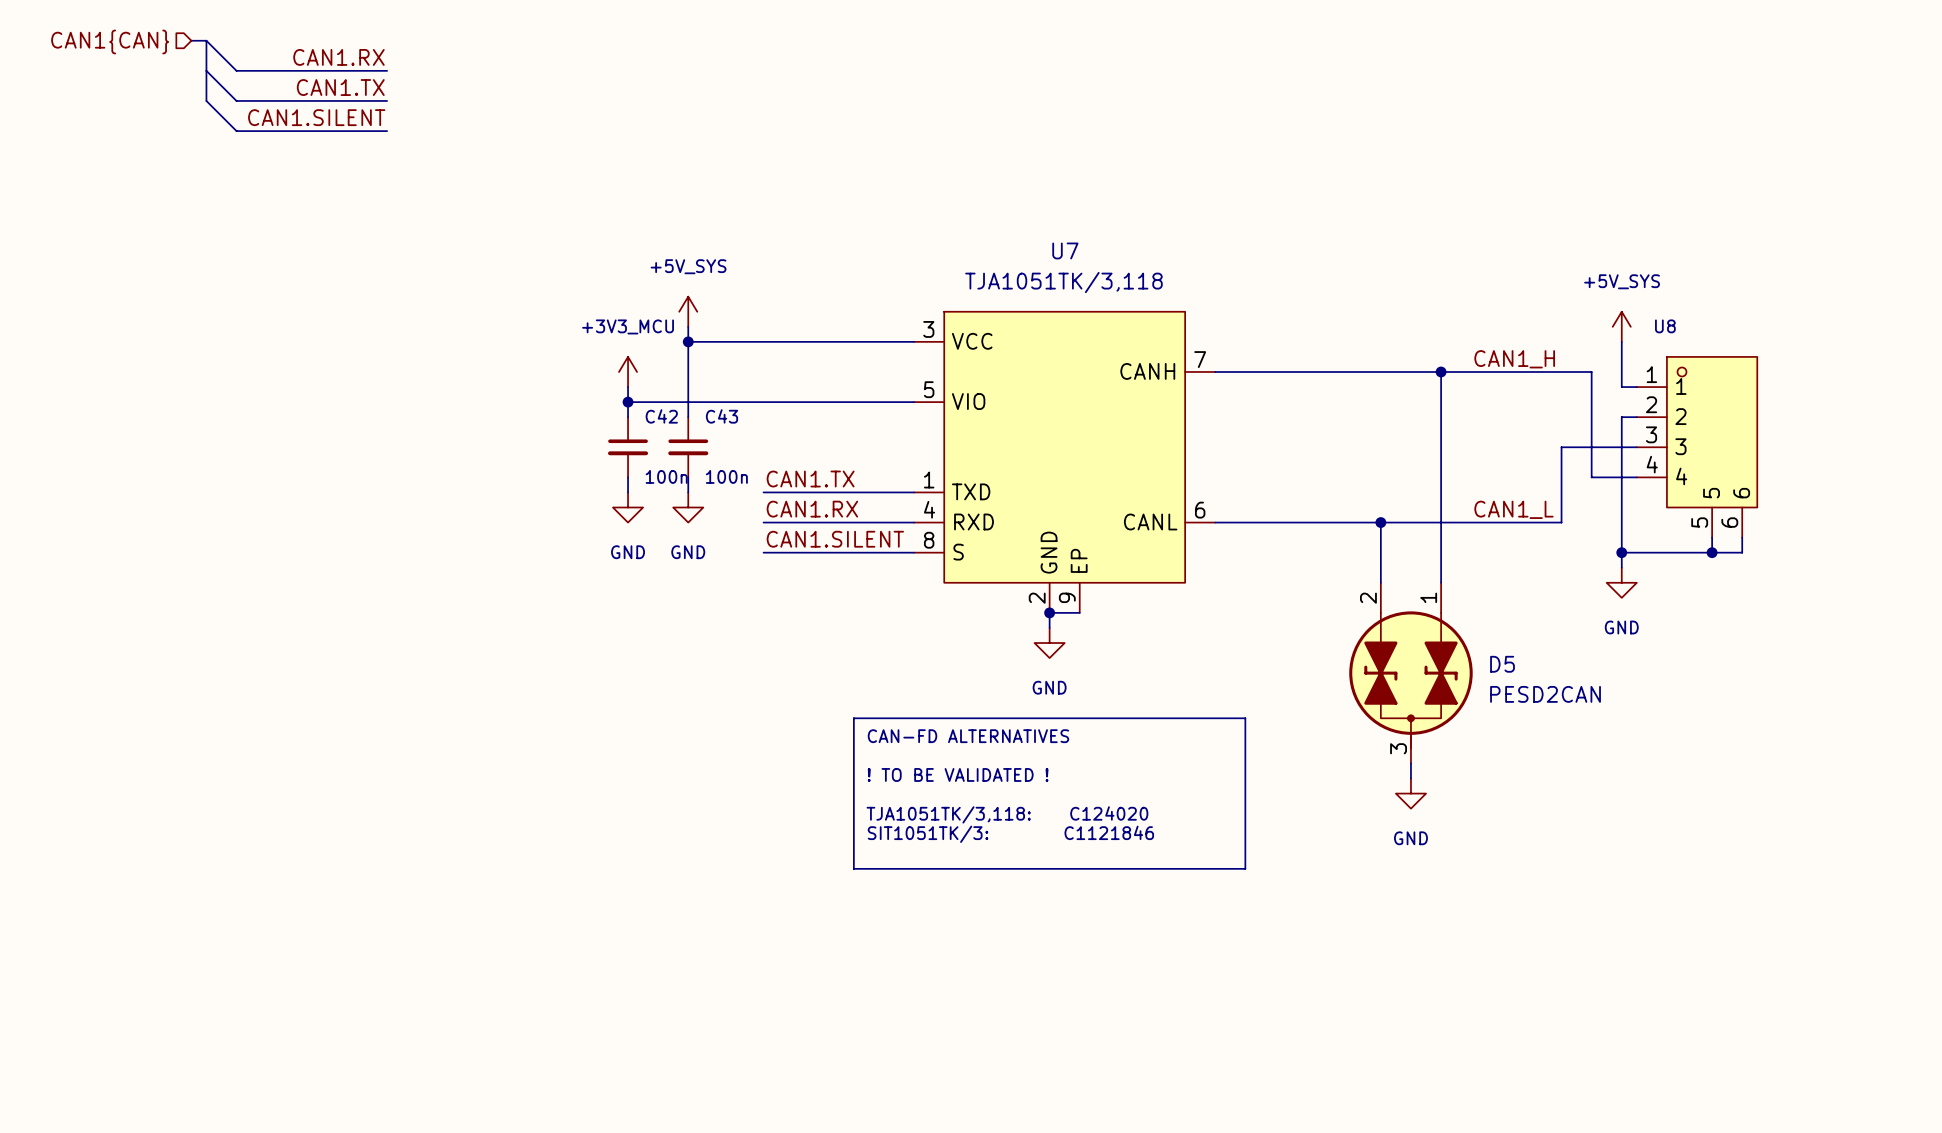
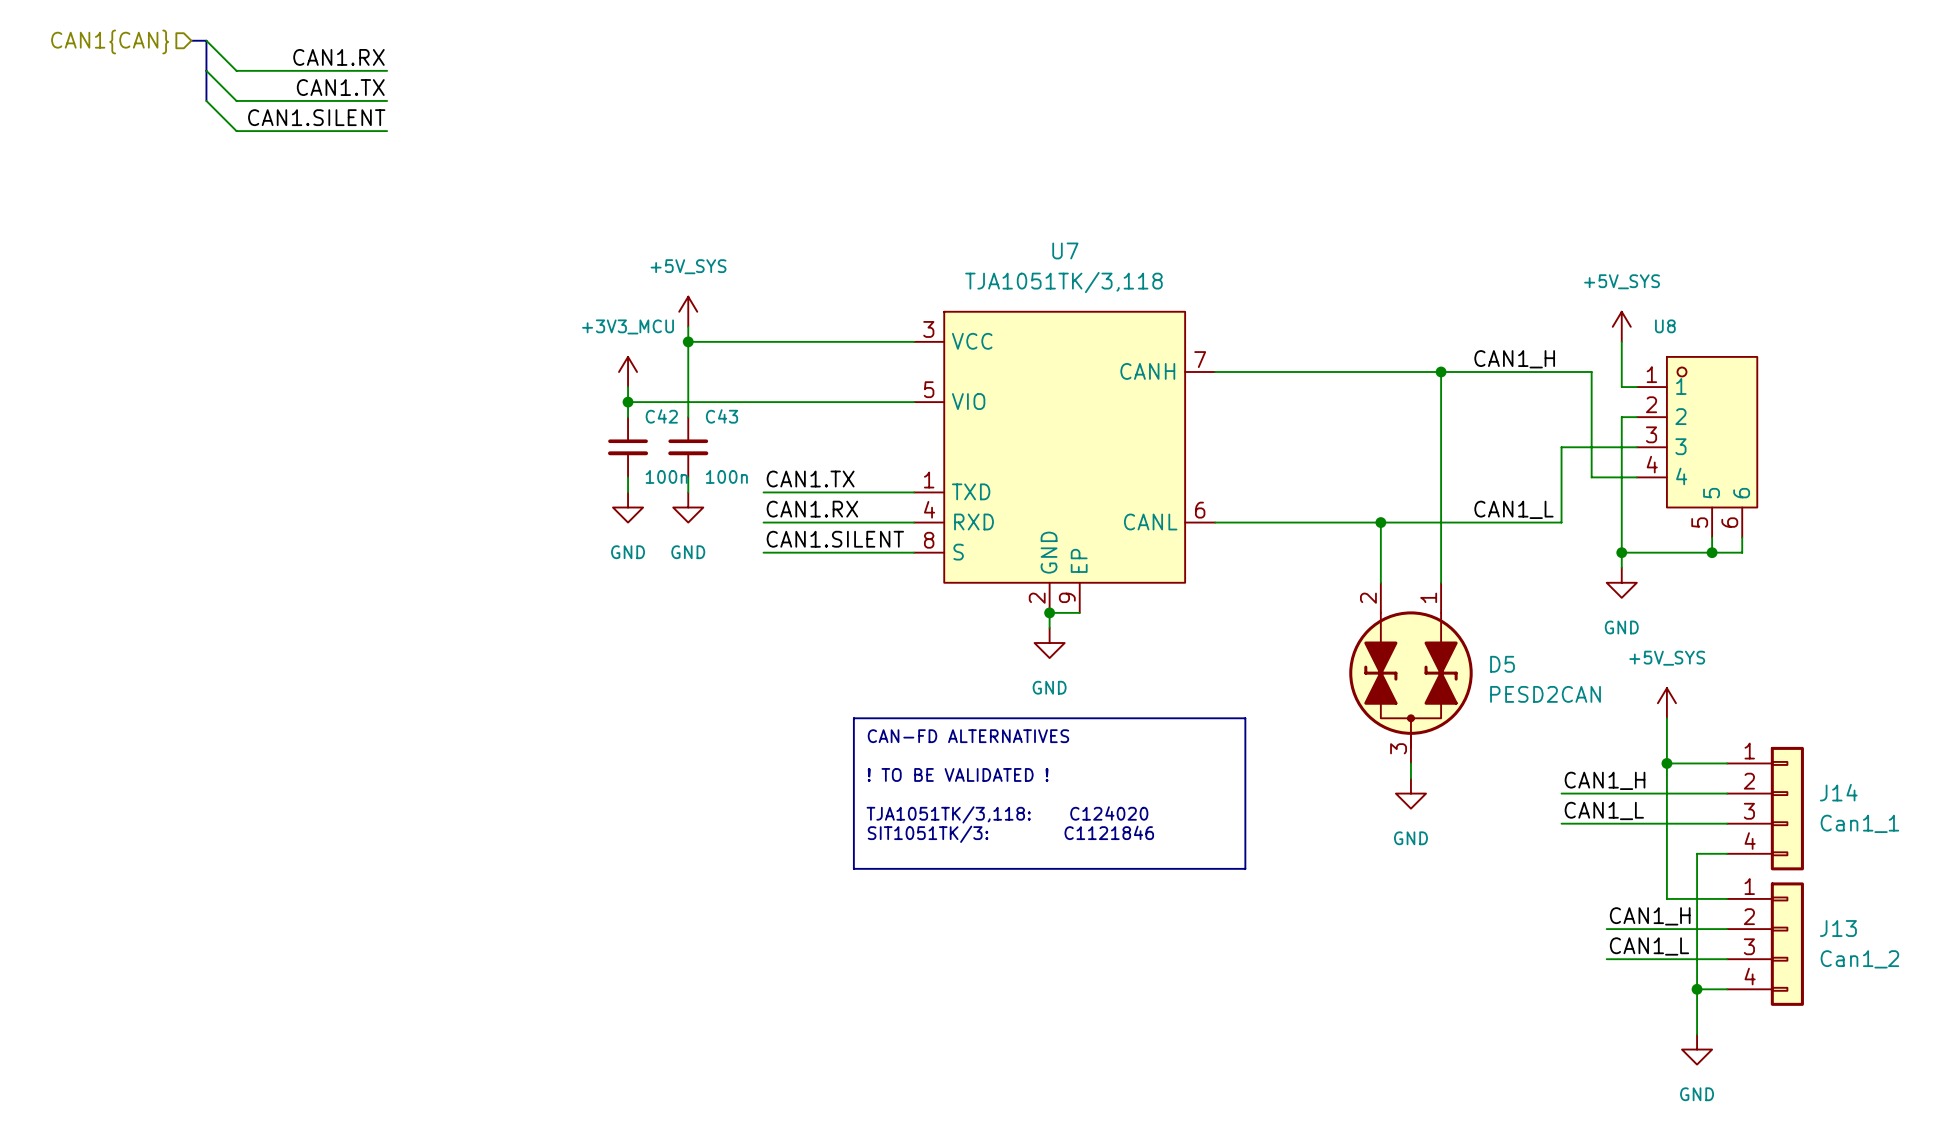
power symbol: none -> +5V_SYS (1666, 703)
wire: none -> (1666, 718) (1666, 898) (1727, 898)
wire: none -> (1666, 763) (1727, 763)
junction: none -> (1666, 763)
label: none -> CAN1_H (1605, 780)
wire: none -> (1561, 793) (1727, 793)
J14: none -> Can1_1 (1765, 808)
label: none -> CAN1_L (1604, 810)
wire: none -> (1561, 823) (1727, 823)
wire: none -> (1727, 853) (1697, 853) (1697, 1034)
label: none -> CAN1_H (1650, 916)
wire: none -> (1606, 929) (1727, 929)
J13: none -> Can1_2 (1765, 944)
label: none -> CAN1_L (1649, 946)
wire: none -> (1606, 959) (1727, 959)
wire: none -> (1697, 989) (1727, 989)
junction: none -> (1697, 989)
power symbol: none -> GND (1697, 1049)

